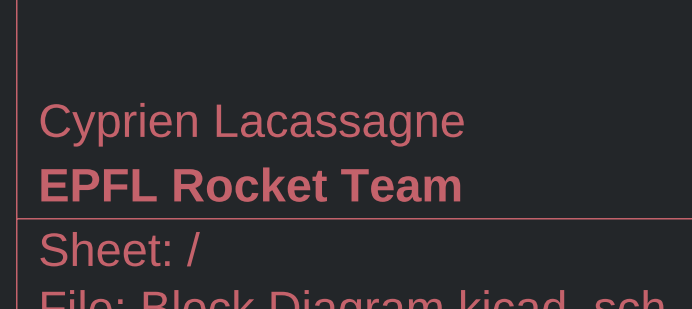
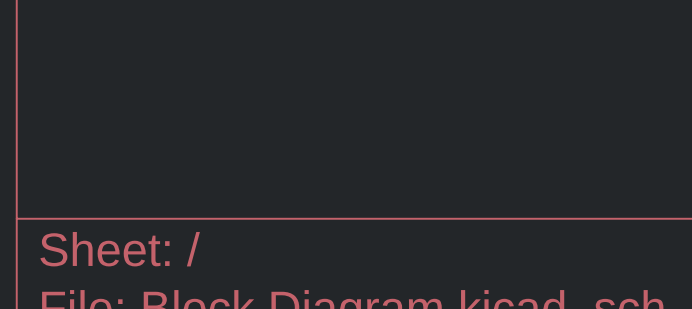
title block: Cyprien Lacassagne (252, 124) -> none
title block: EPFL Rocket Team (250, 184) -> none

